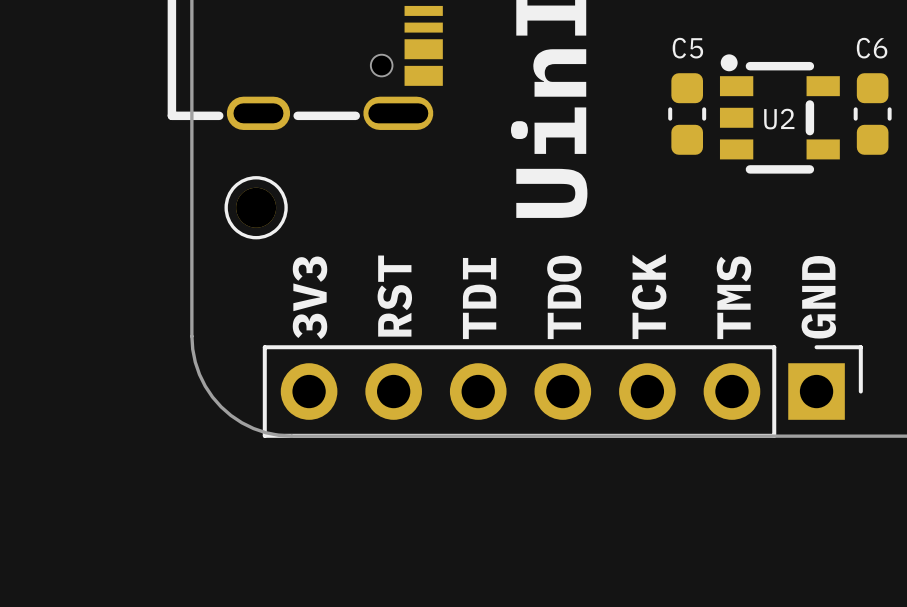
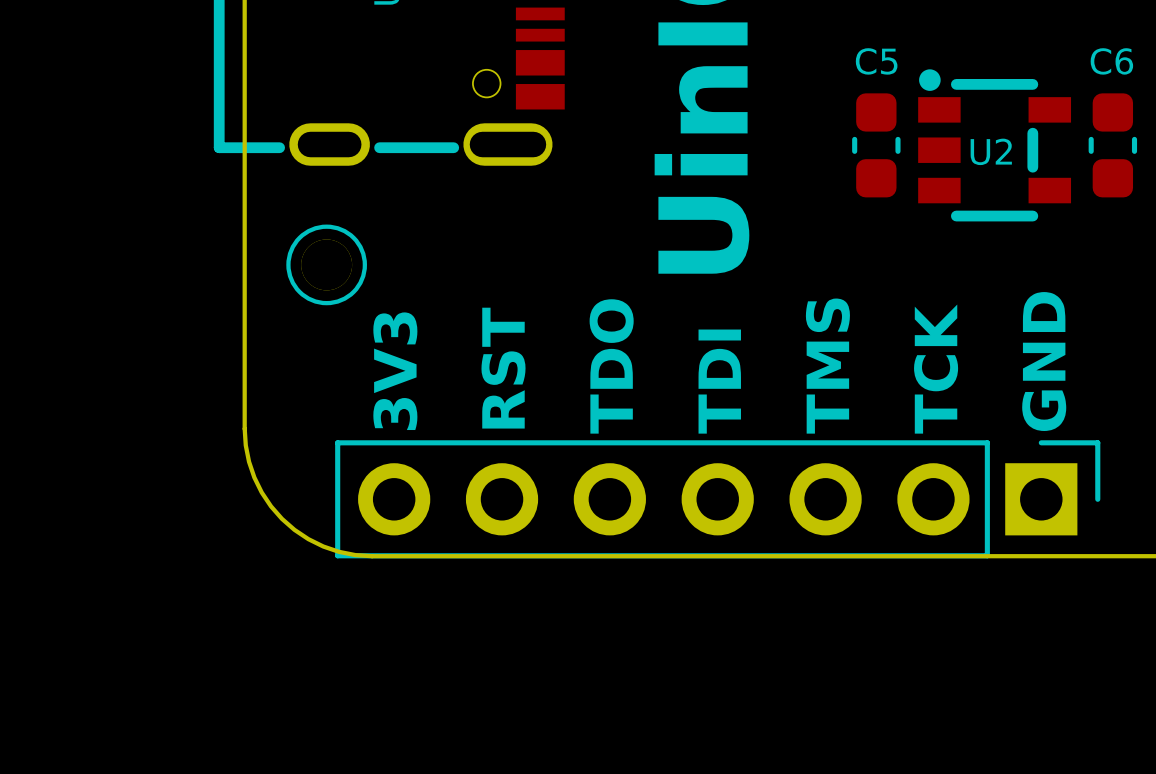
text: TCK (649, 296) -> TMS (827, 366)
text: TDO (564, 297) -> TDI (719, 381)
text: TMS (733, 297) -> TCK (936, 369)
text: TDI (479, 298) -> TDO (611, 366)

